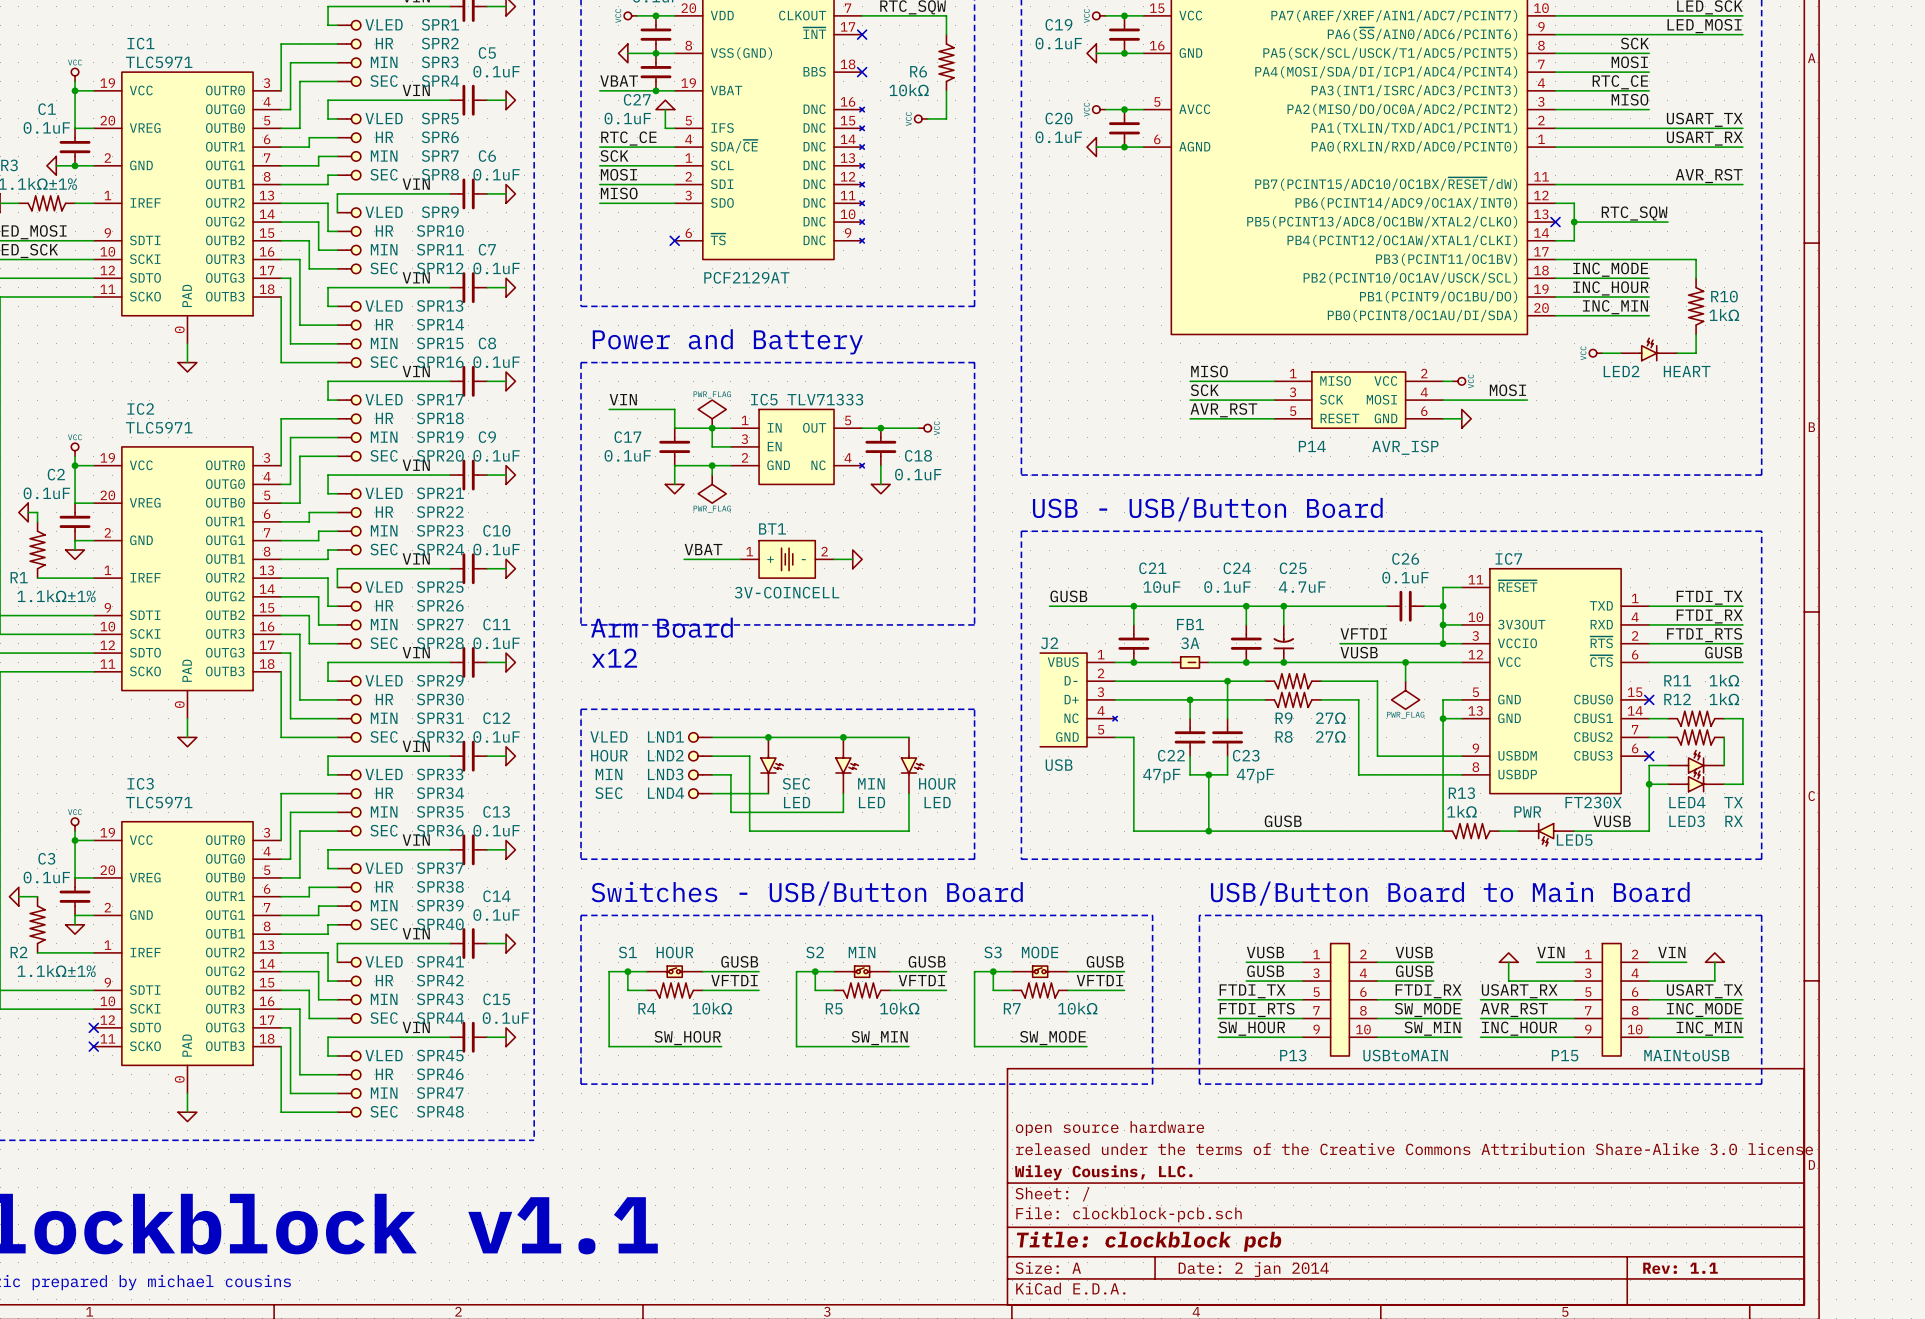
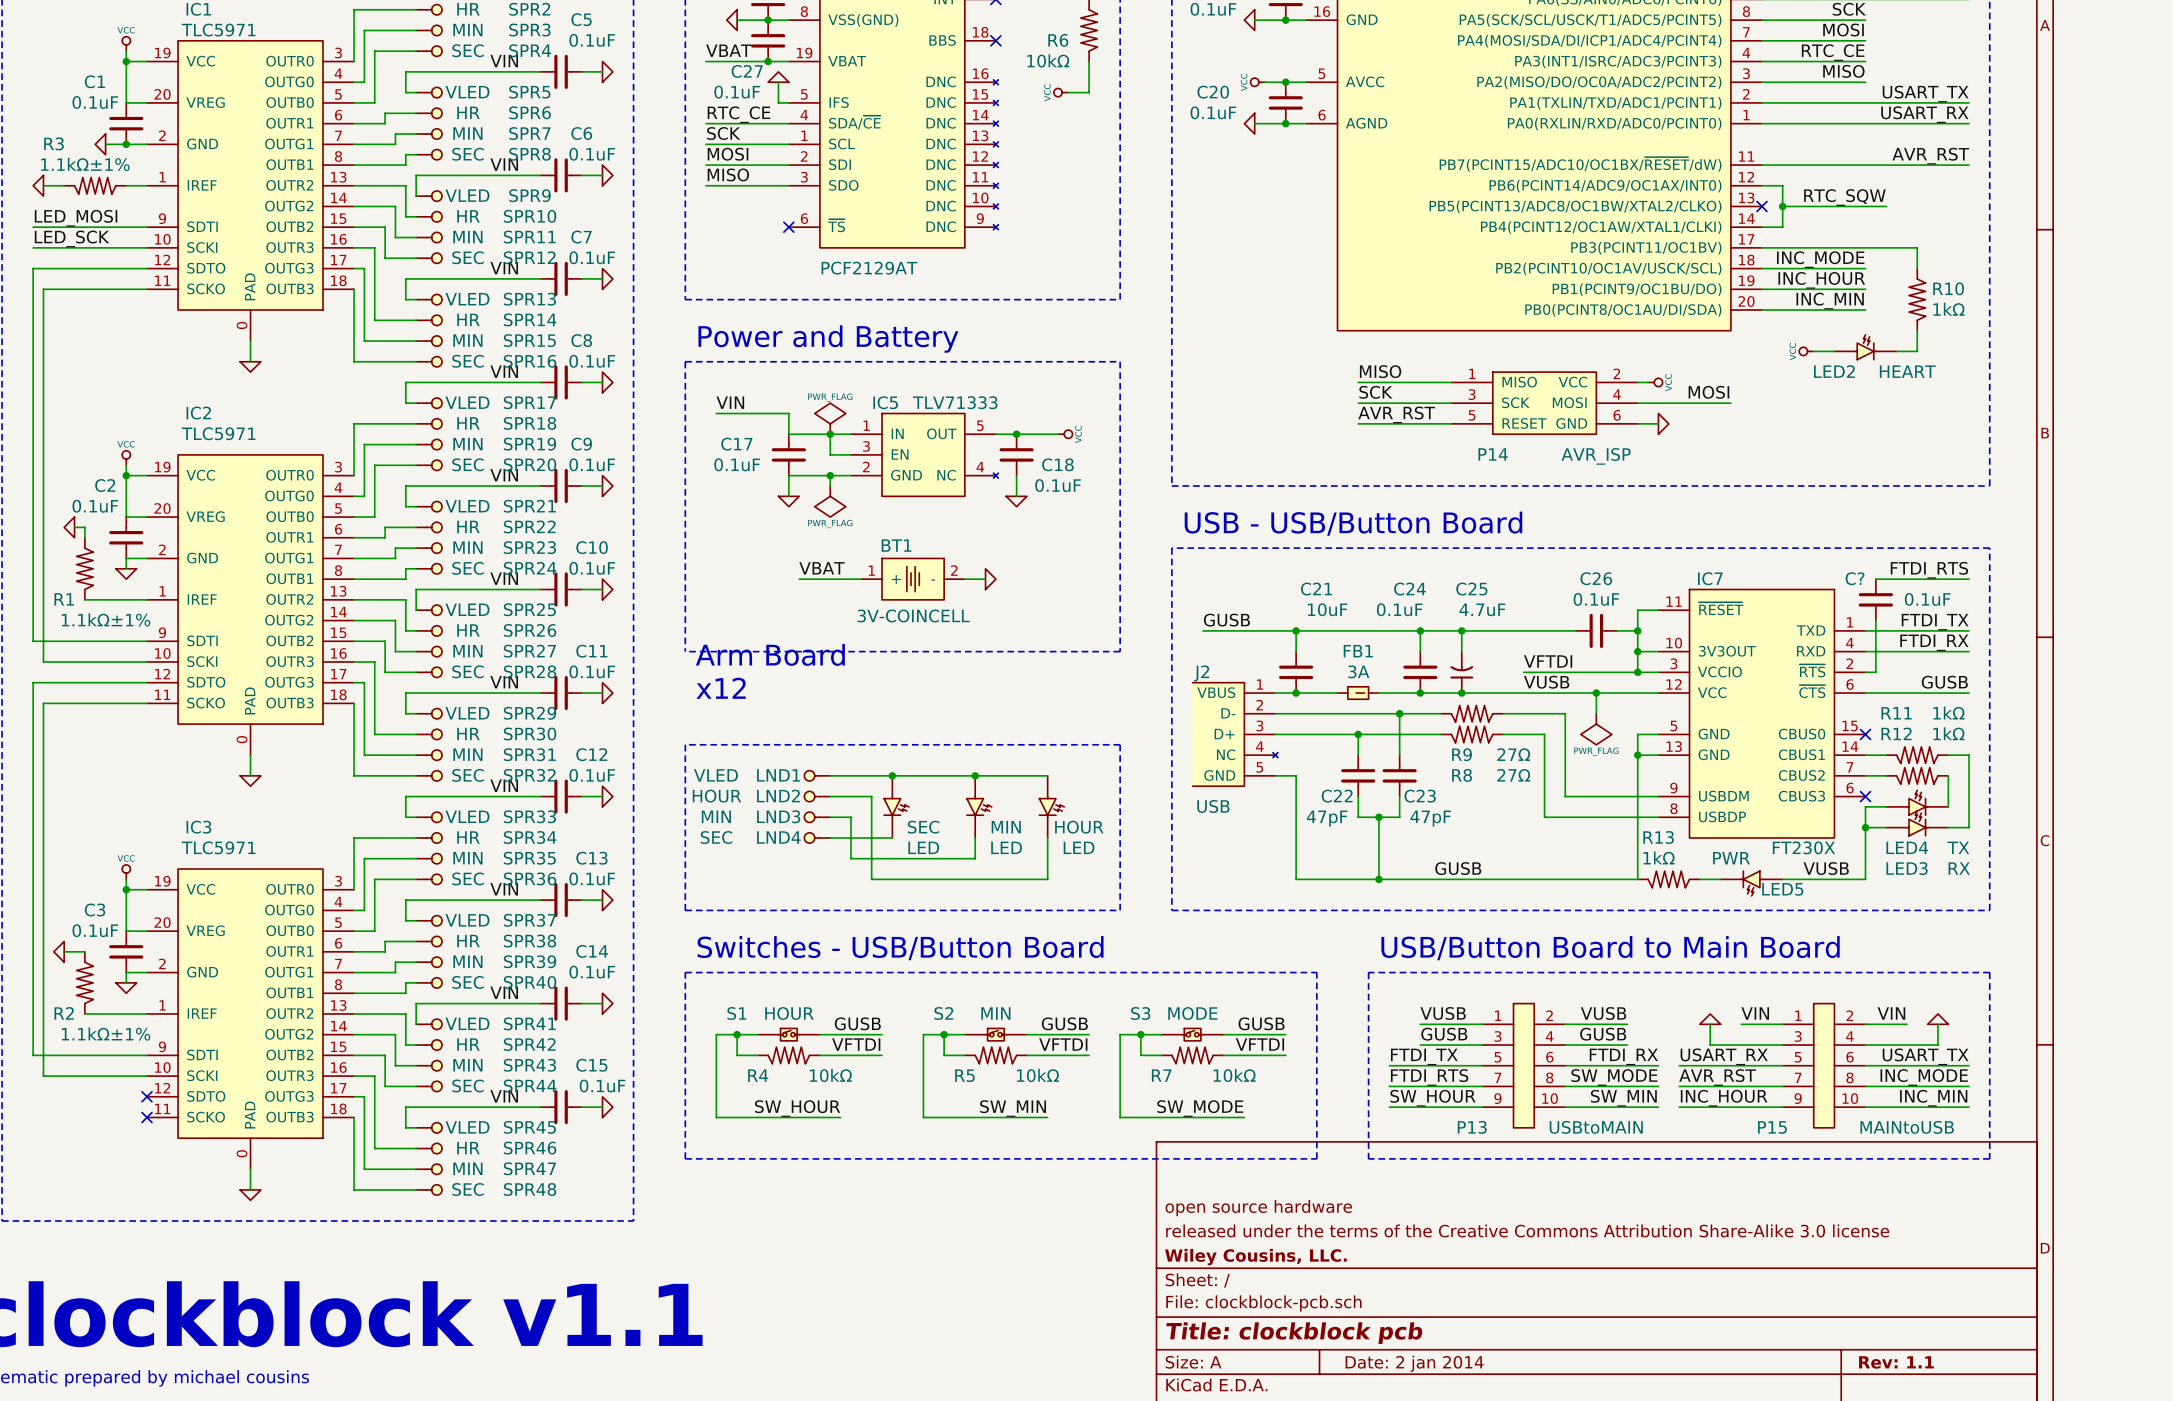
wire: none -> (1875, 579) (1969, 579)
C?: none -> 0.1uF (1875, 599)
label position: FTDI_RTS (1704, 635) -> FTDI_RTS (1929, 570)
wire: (1658, 643) (1742, 643) -> (1875, 672) (1875, 620)

